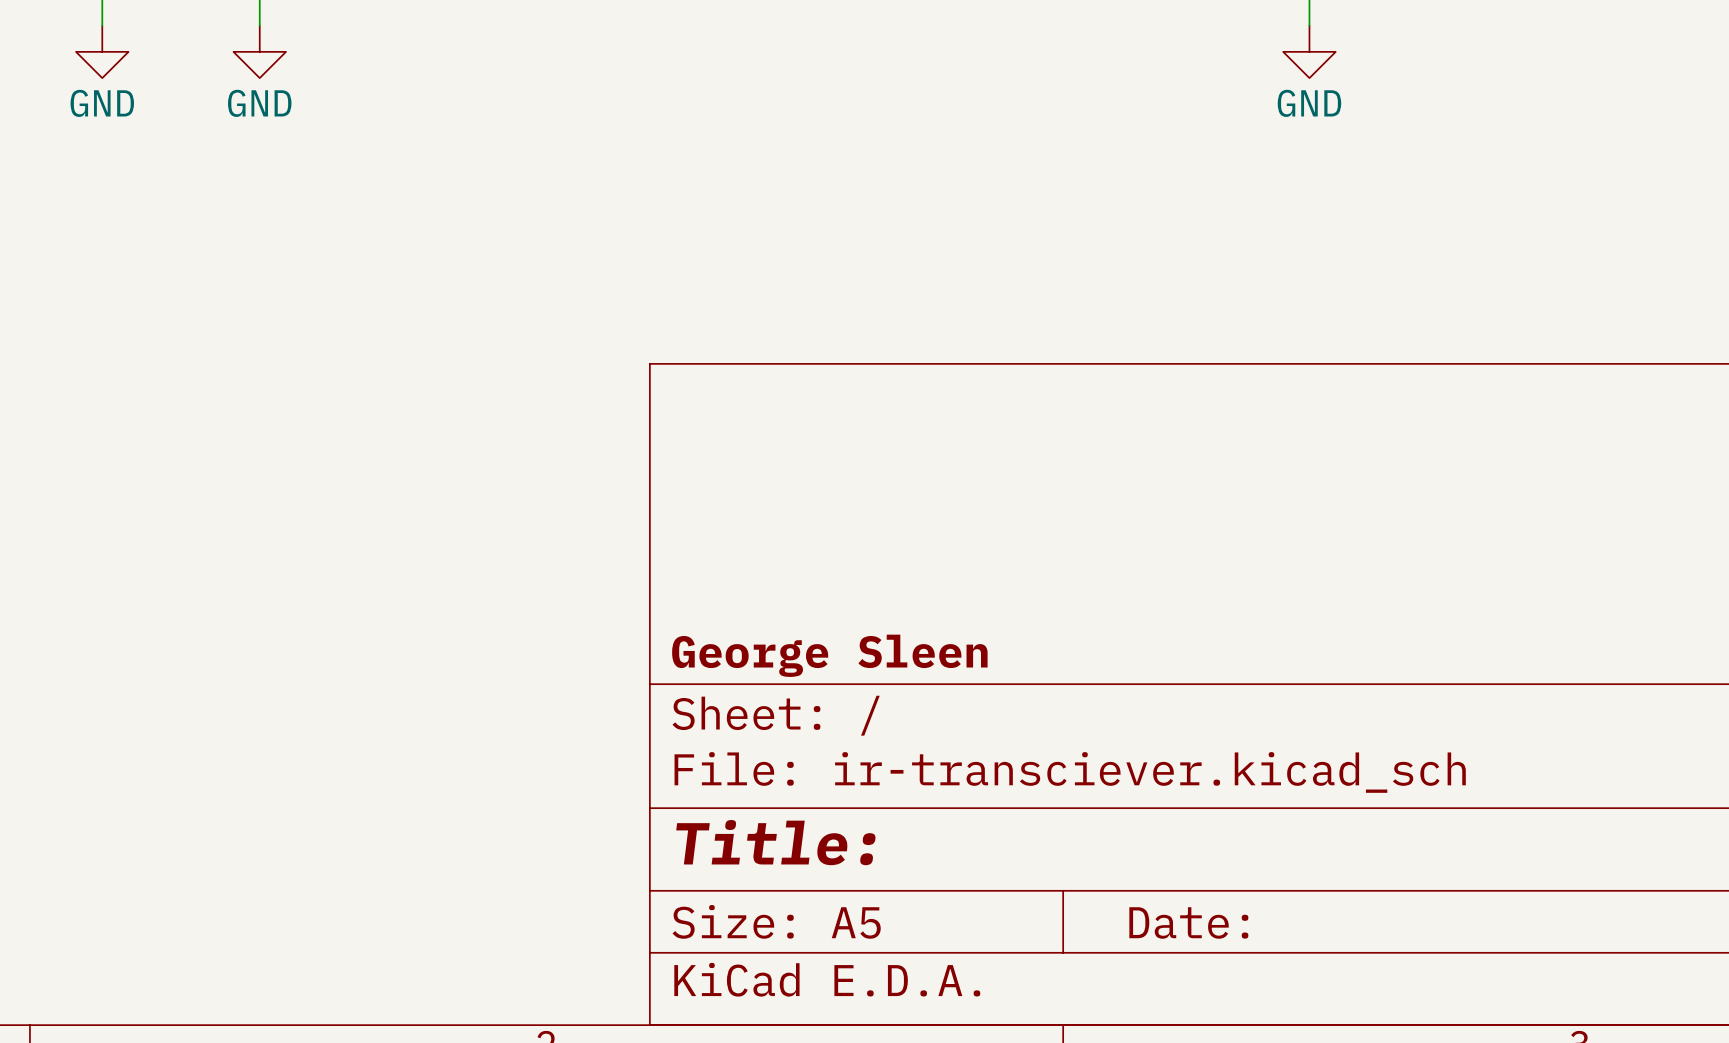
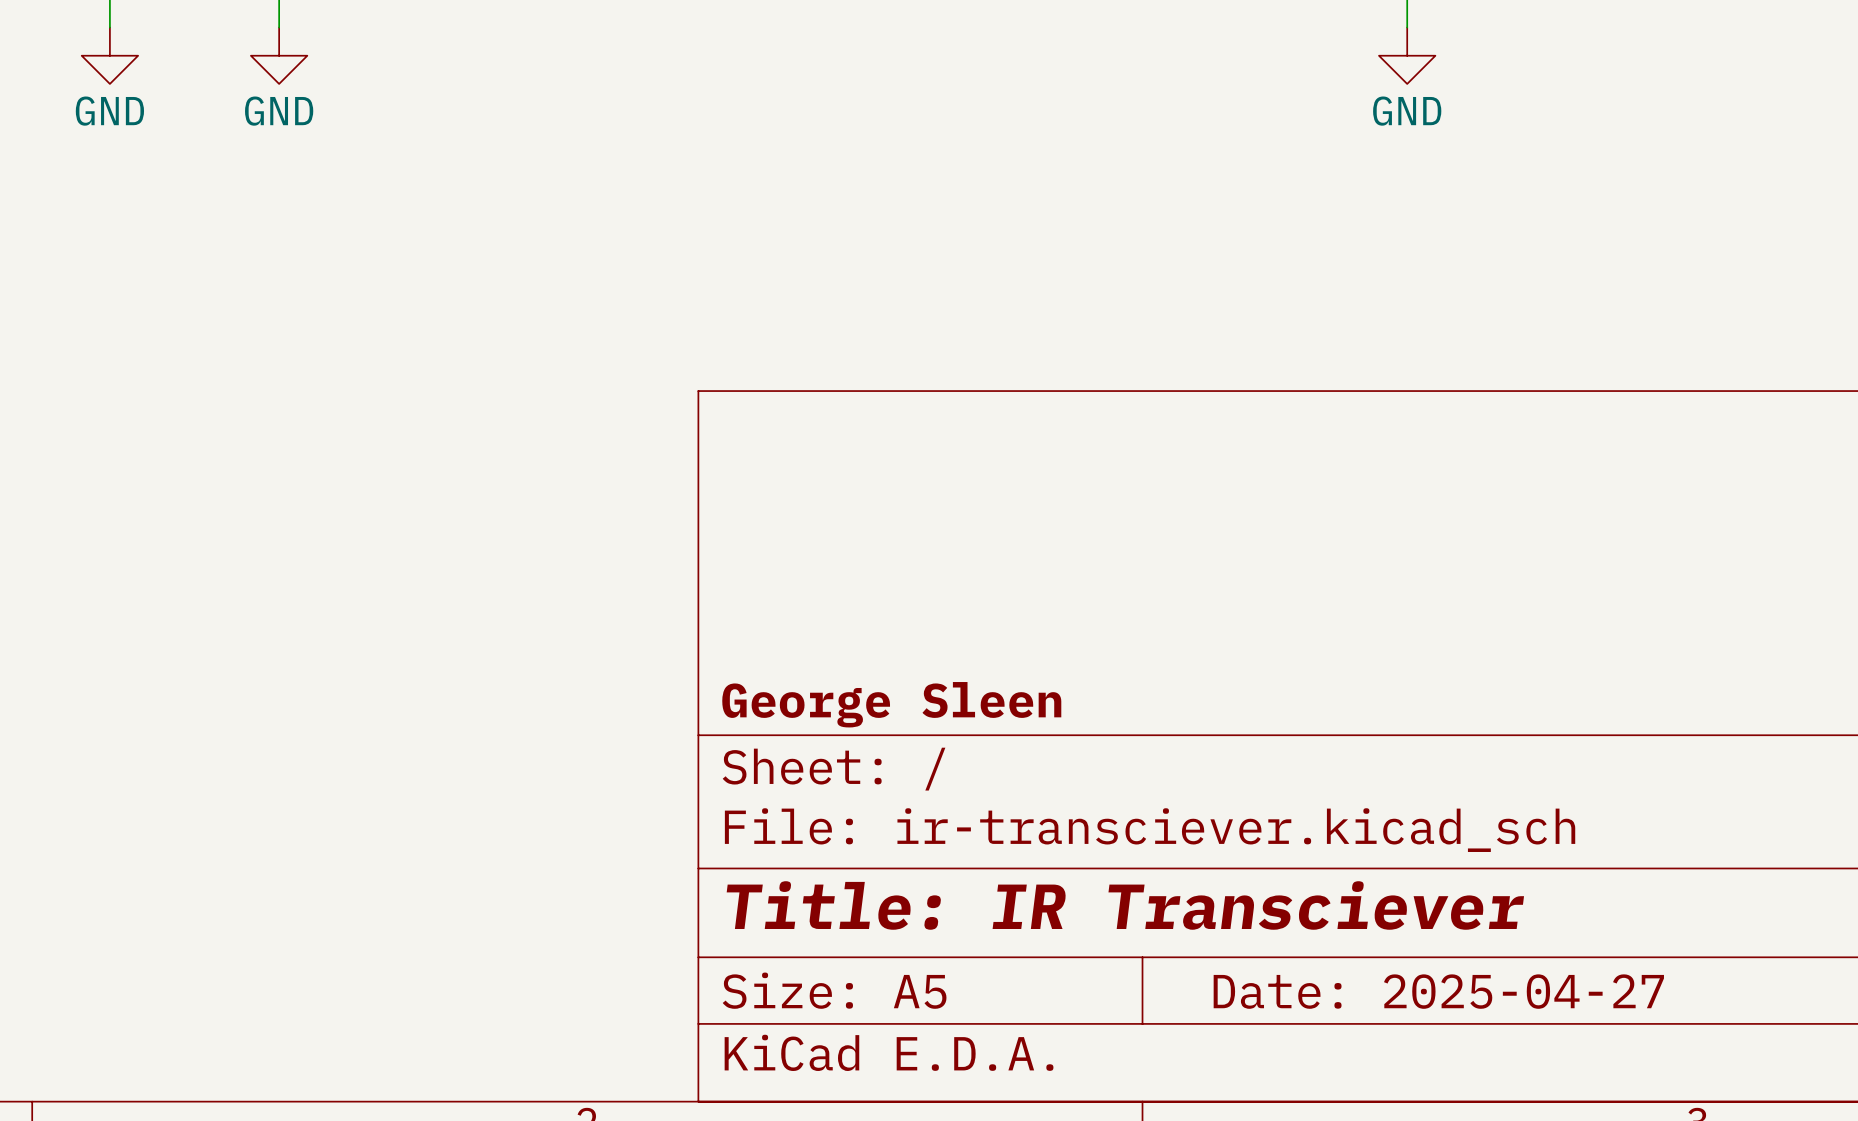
title block: Title: (775, 842) -> Title: IR Transciever (1125, 905)
title block: Date: (1188, 922) -> Date: 2025-04-27 (1438, 991)

